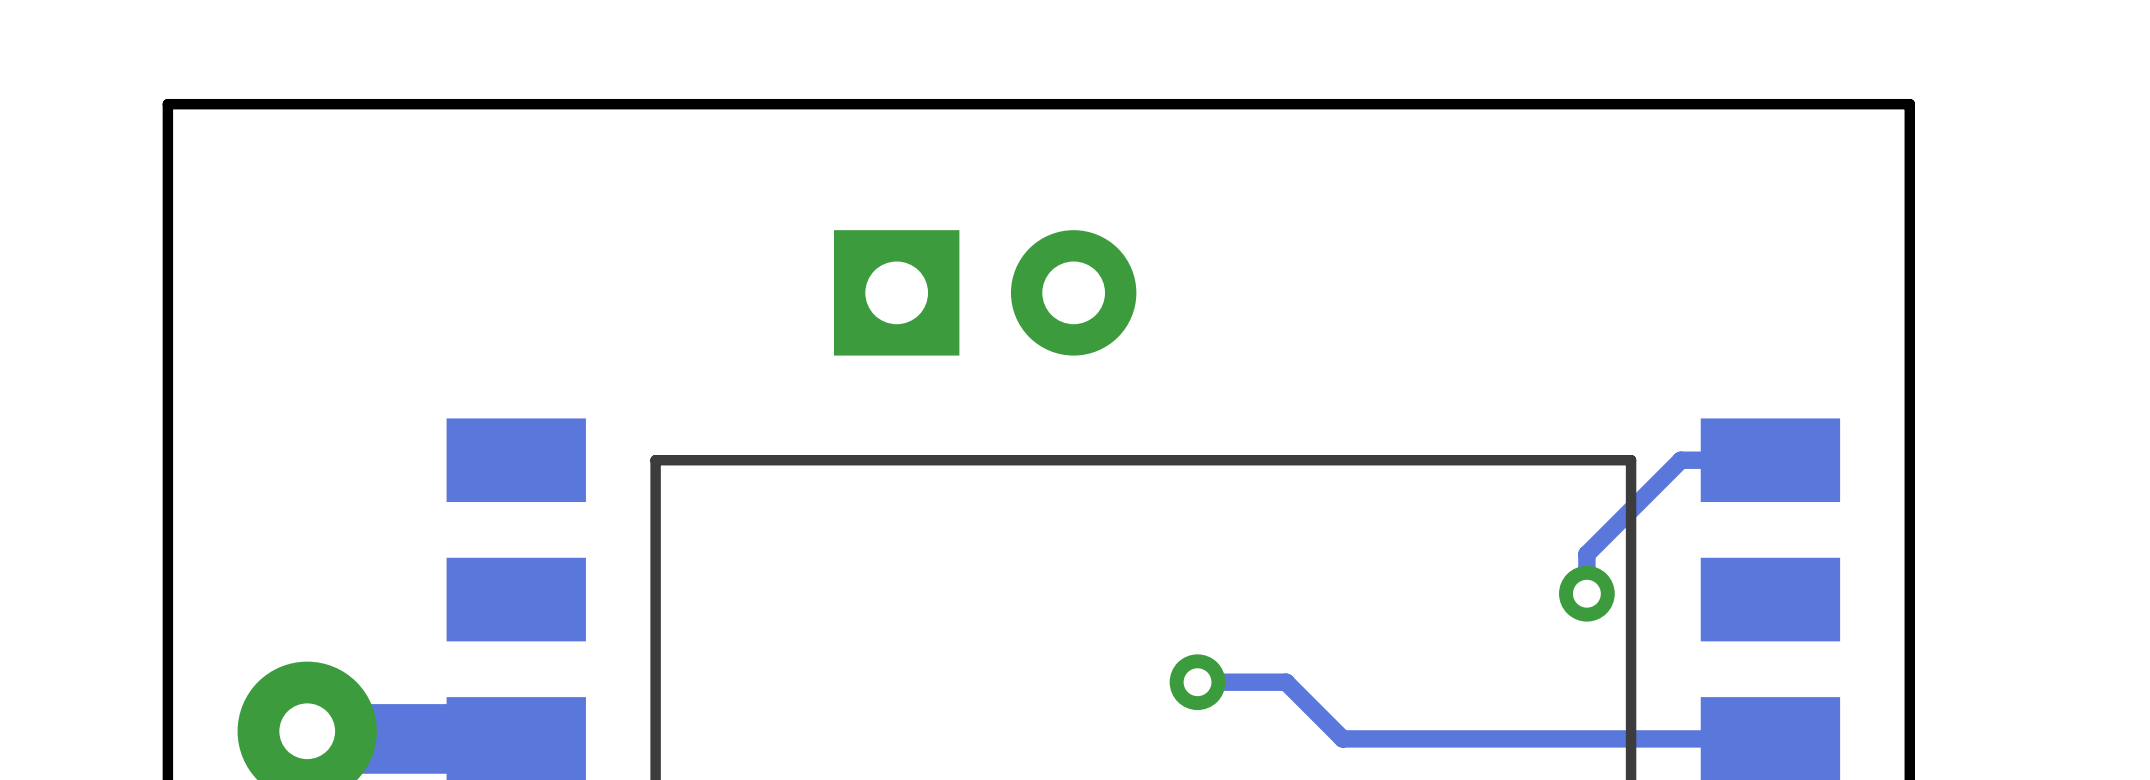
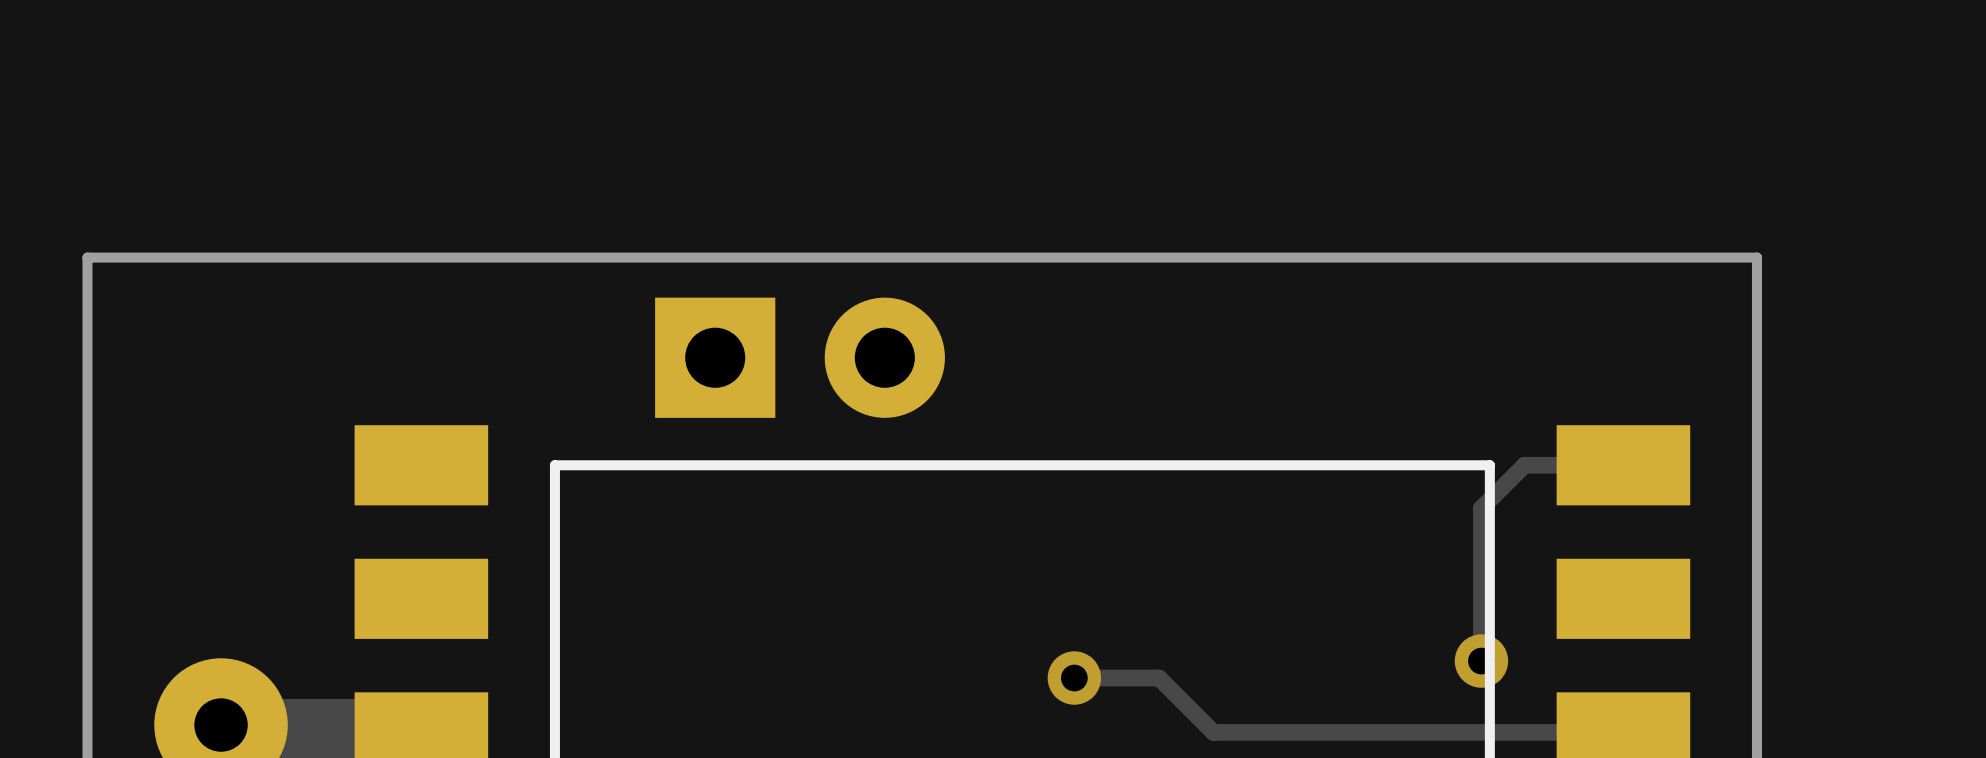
board edge: (1909, 243) (1909, 104) (167, 104) (167, 243) -> (1756, 257) (87, 257)
part position: (985, 292) -> (800, 357)
track: (1680, 460) (1586, 554) (1586, 593) -> (1537, 465) (1524, 465) (1481, 508) (1481, 661)
via position: (1586, 593) -> (1481, 661)

